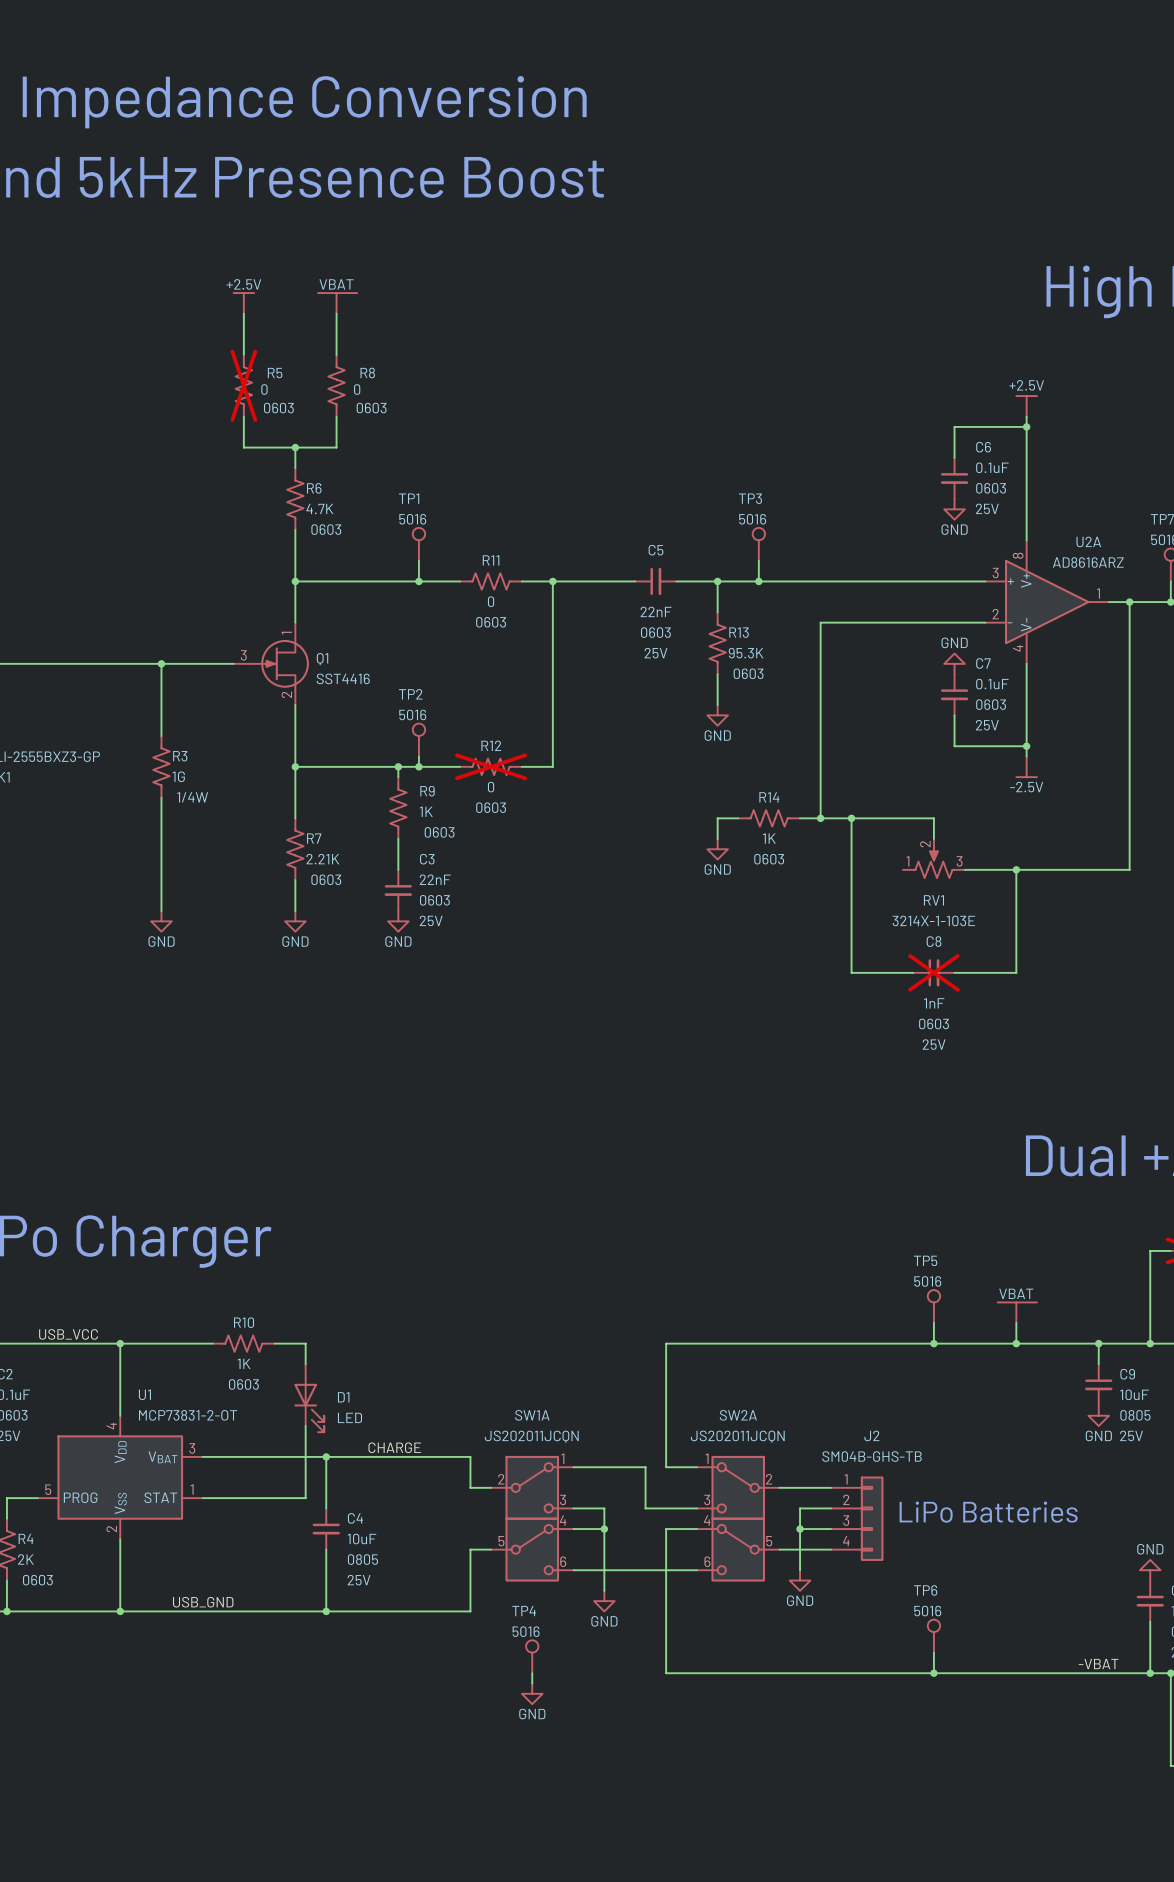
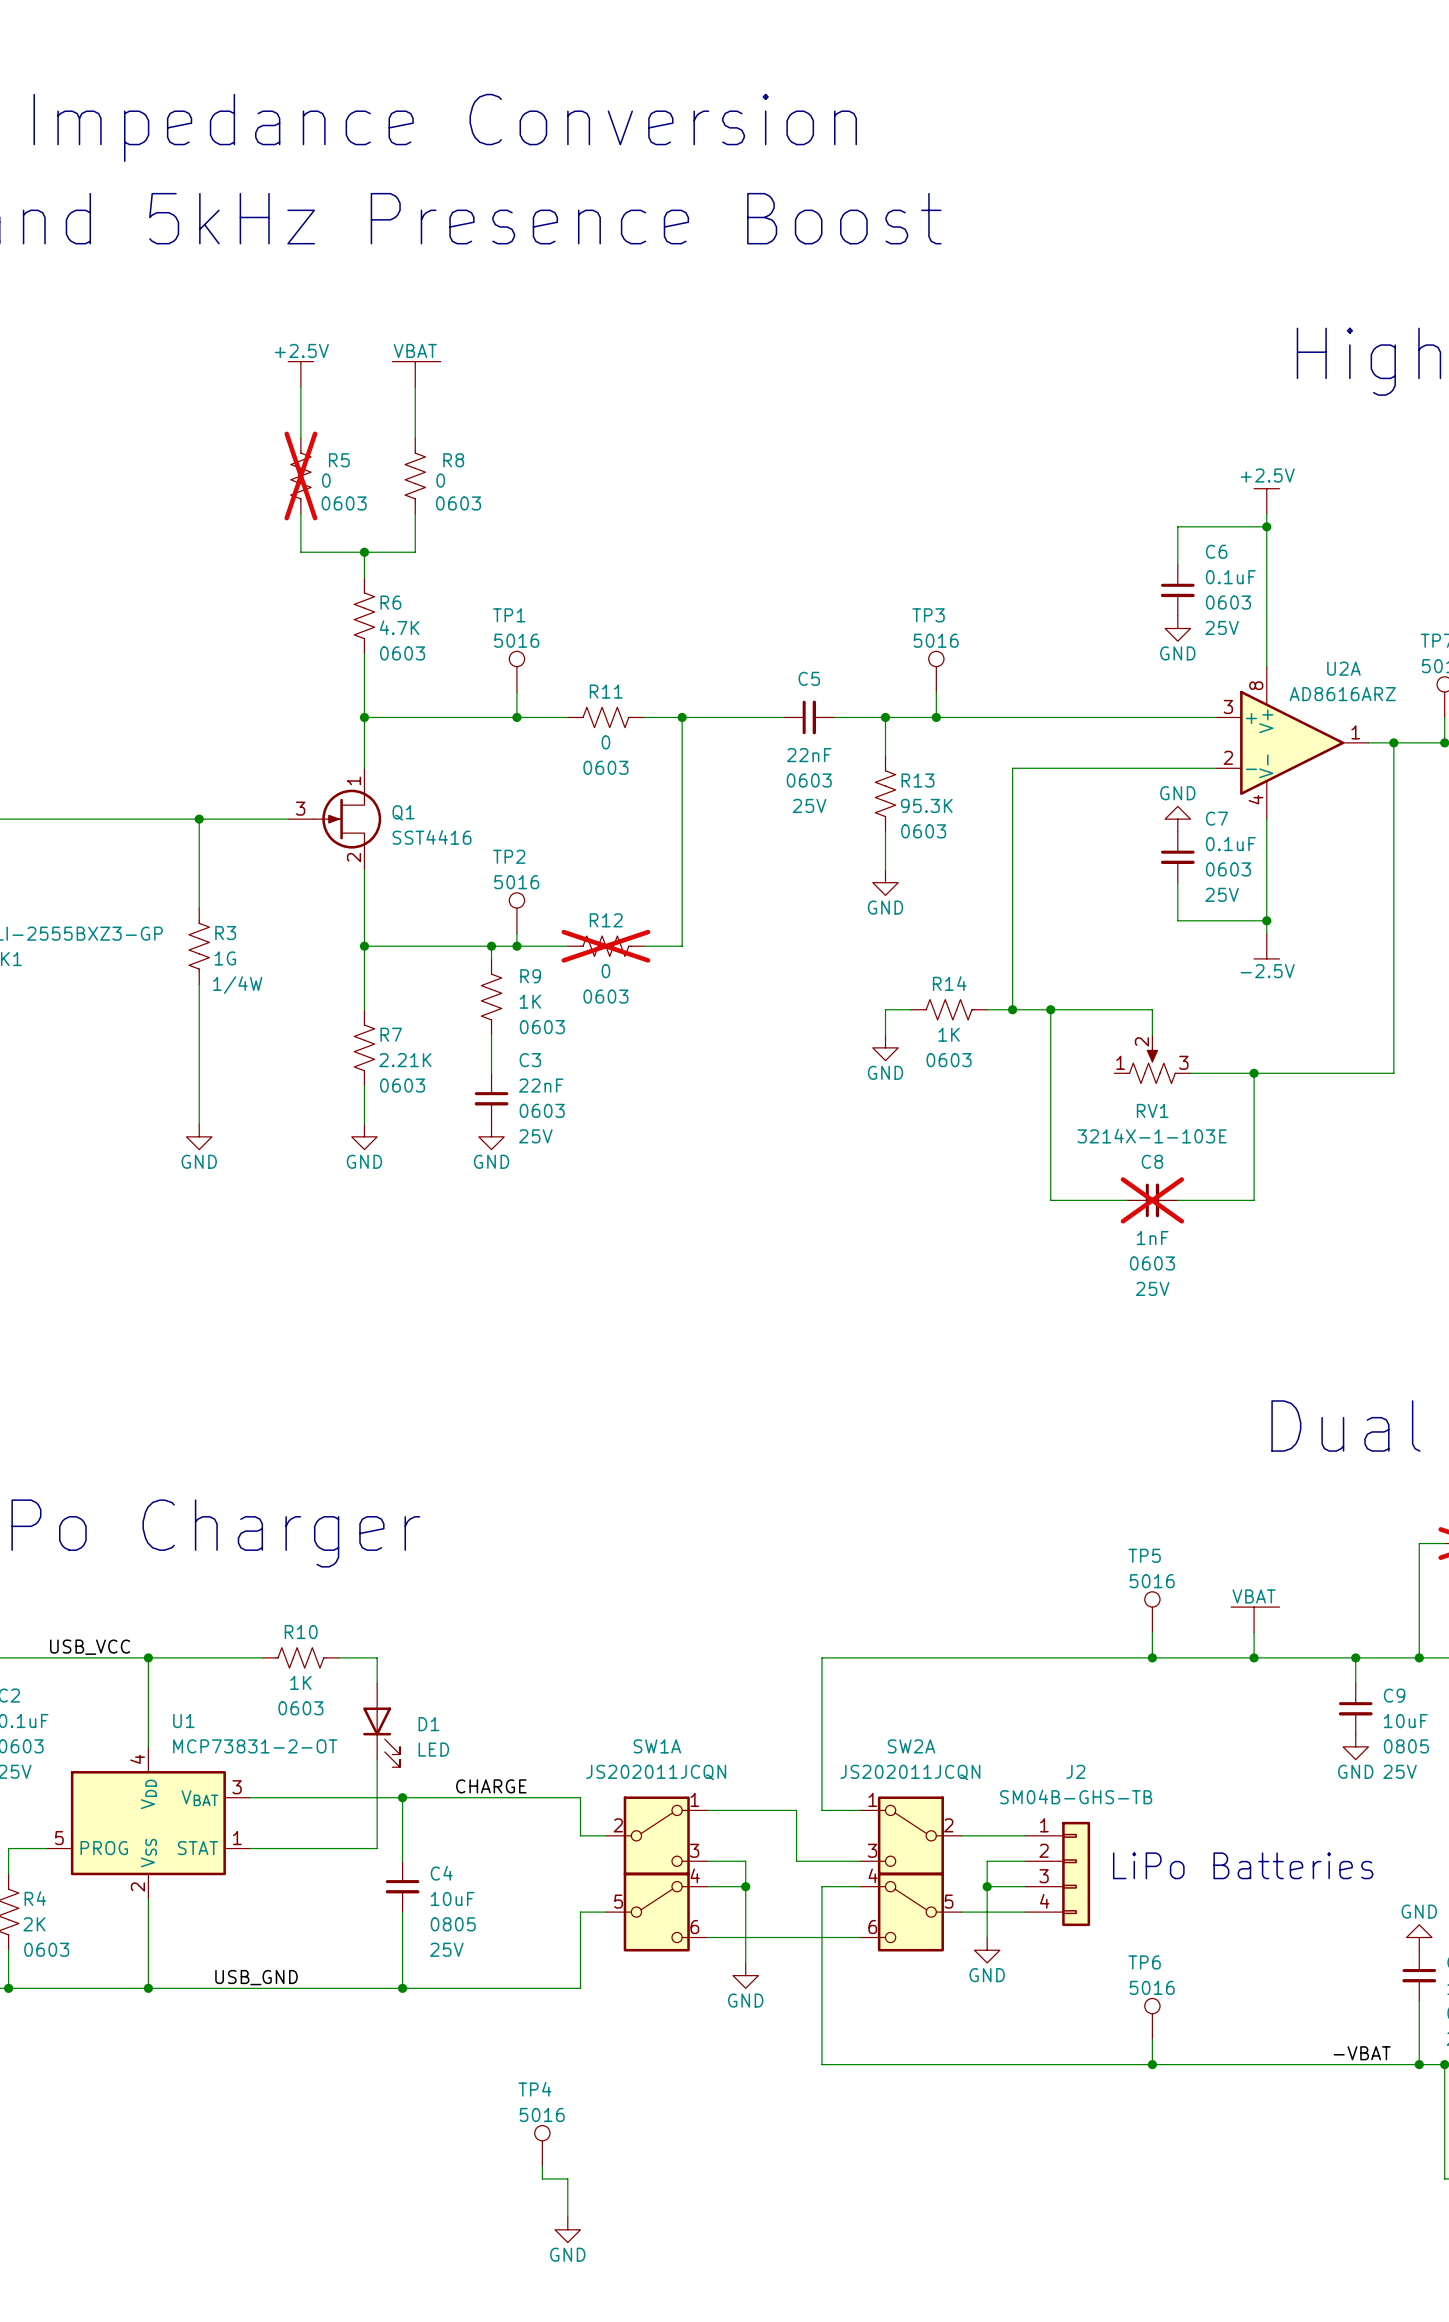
TP4 position: (532, 1656) -> (542, 2145)
wire: (532, 1673) (532, 1683) -> none
power symbol position: GND (532, 1693) -> GND (567, 2229)
wire: none -> (542, 2166) (542, 2178) (567, 2178) (567, 2217)

